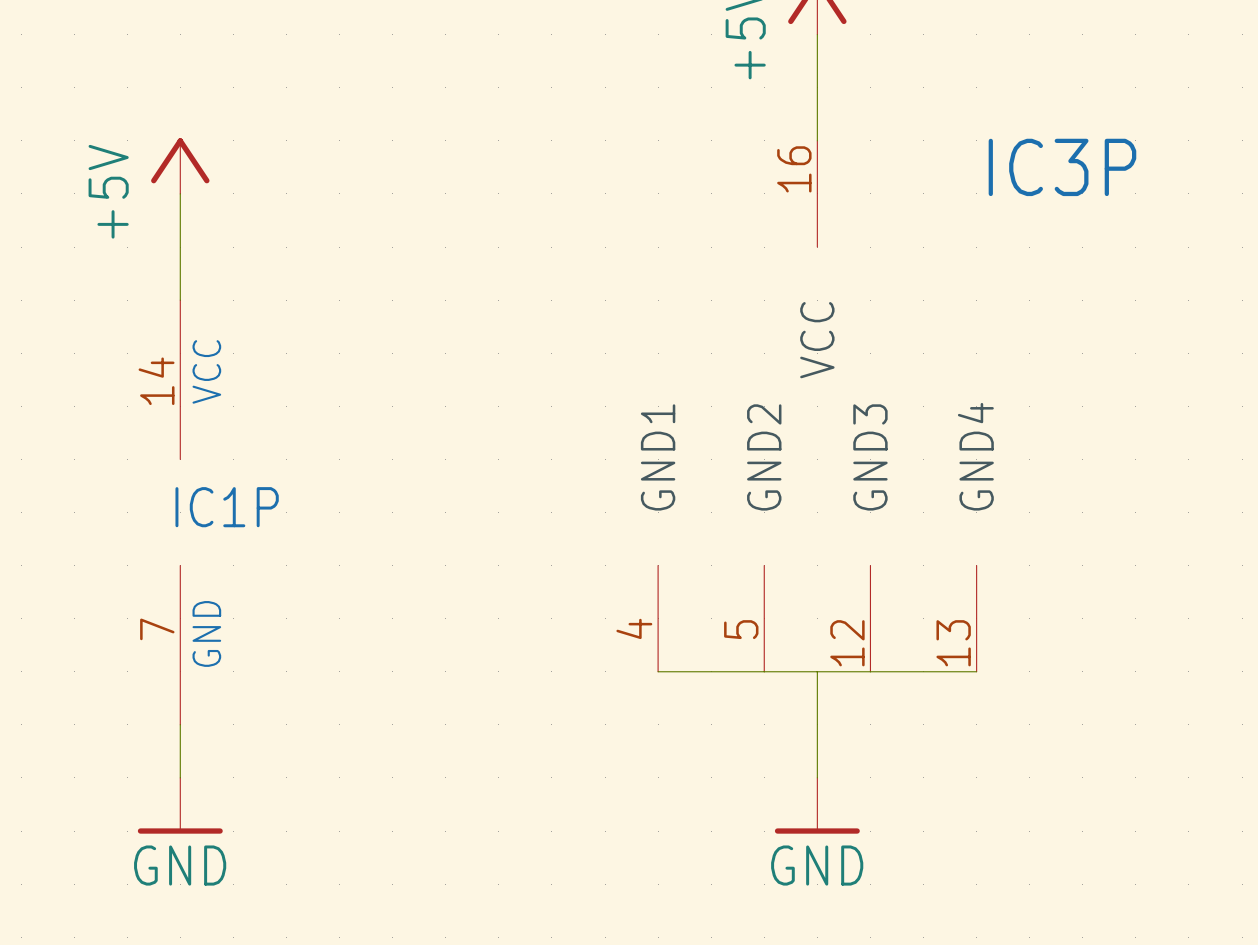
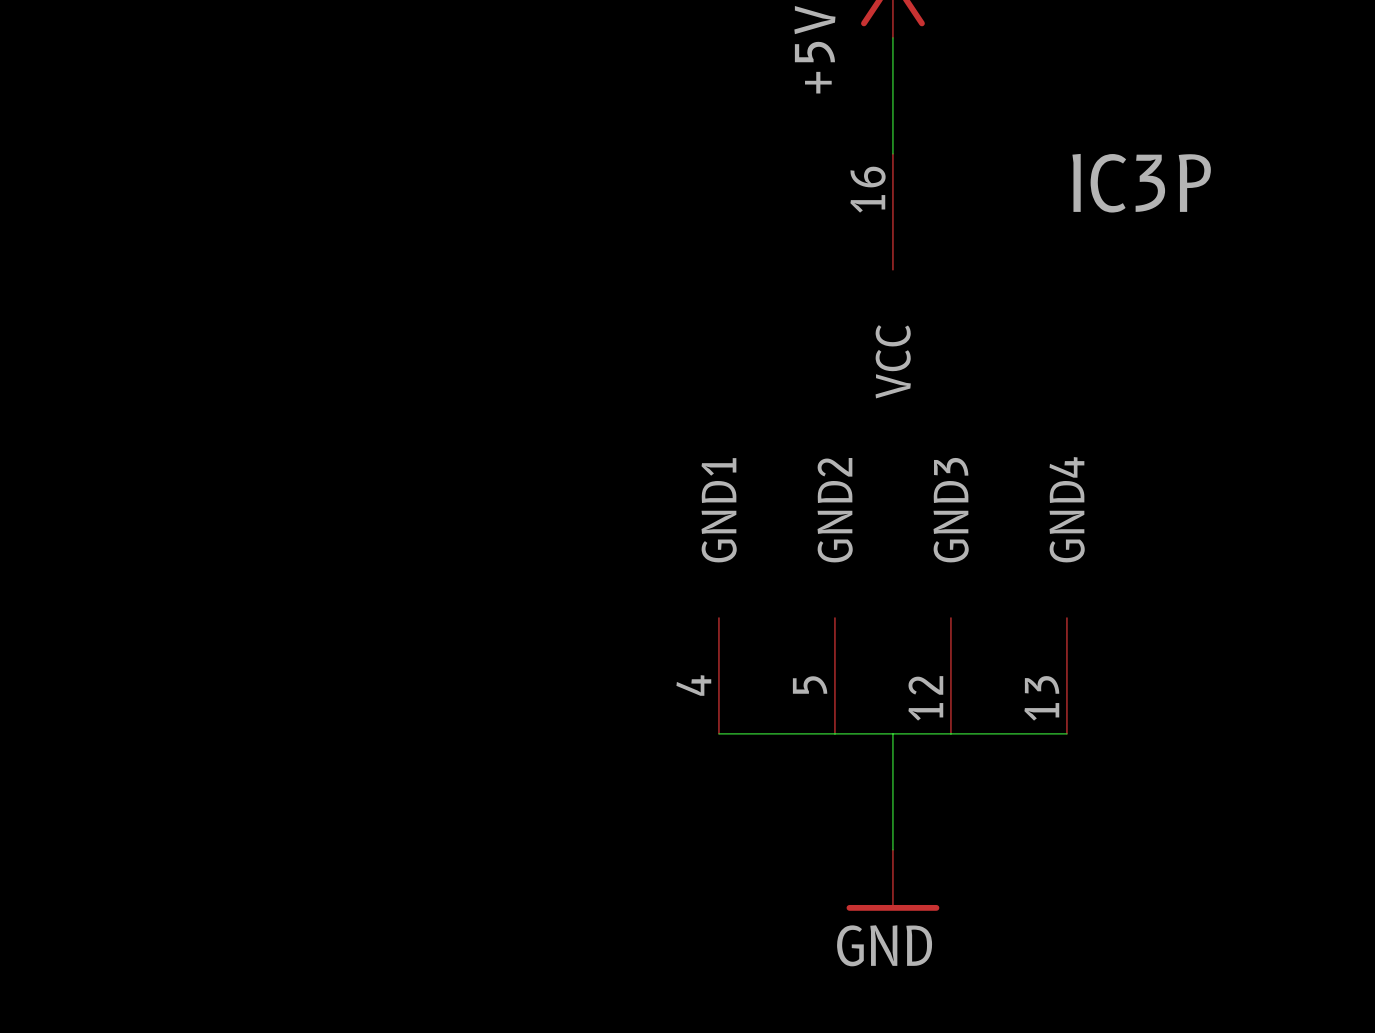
power symbol: +5V (180, 166) -> none
wire: (180, 193) (180, 300) -> none
IC1P: (180, 512) -> none
wire: (180, 724) (180, 777) -> none
power symbol: GND (180, 805) -> none

